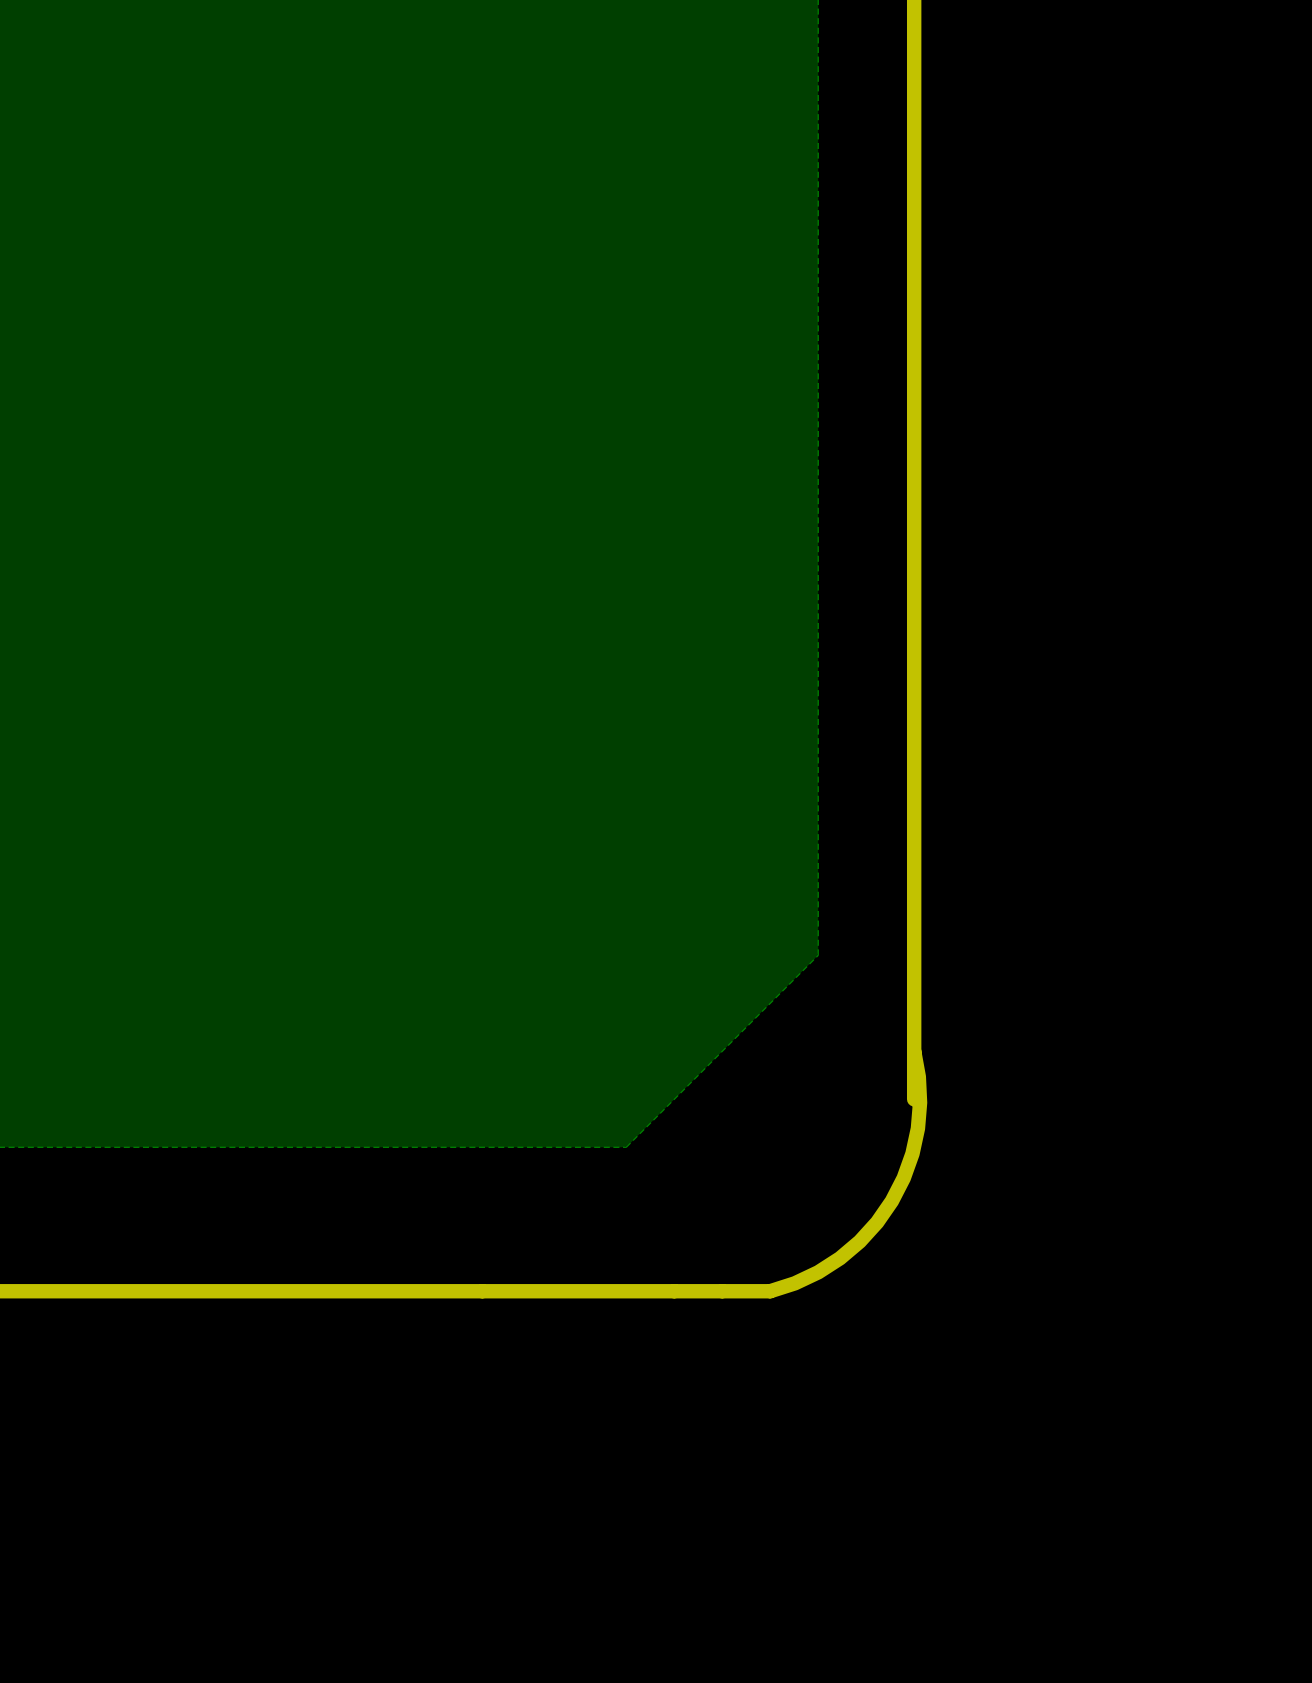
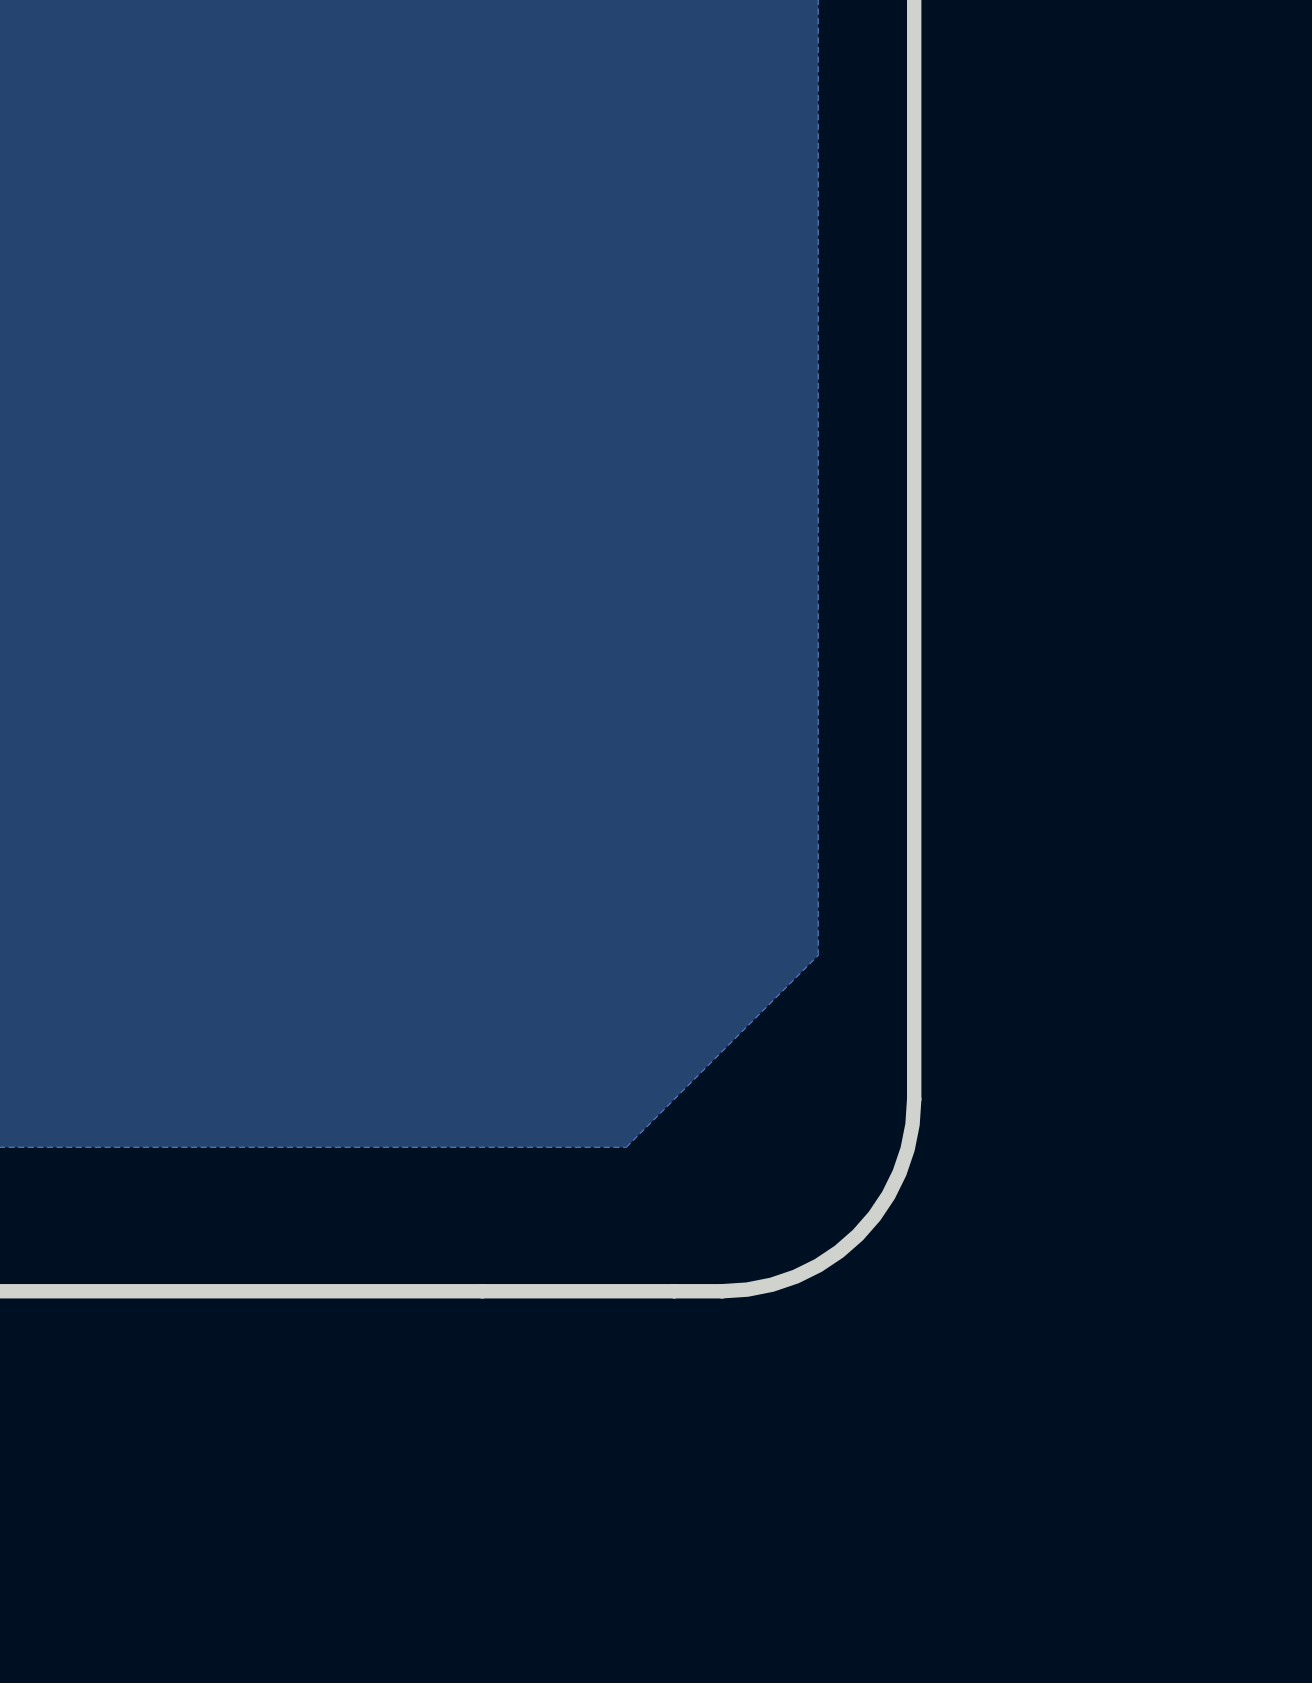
board edge: (914, 1051) (918, 1076) (920, 1102) (917, 1128) (912, 1153) (903, 1178) (891, 1201) (877, 1222) (859, 1241) (840, 1258) (818, 1272) (794, 1283) (770, 1291) (722, 1291) -> (914, 1099) (912, 1124) (907, 1148) (899, 1172) (888, 1195) (874, 1216) (857, 1235) (839, 1251) (818, 1265) (795, 1276) (771, 1284) (747, 1289) (722, 1291)

